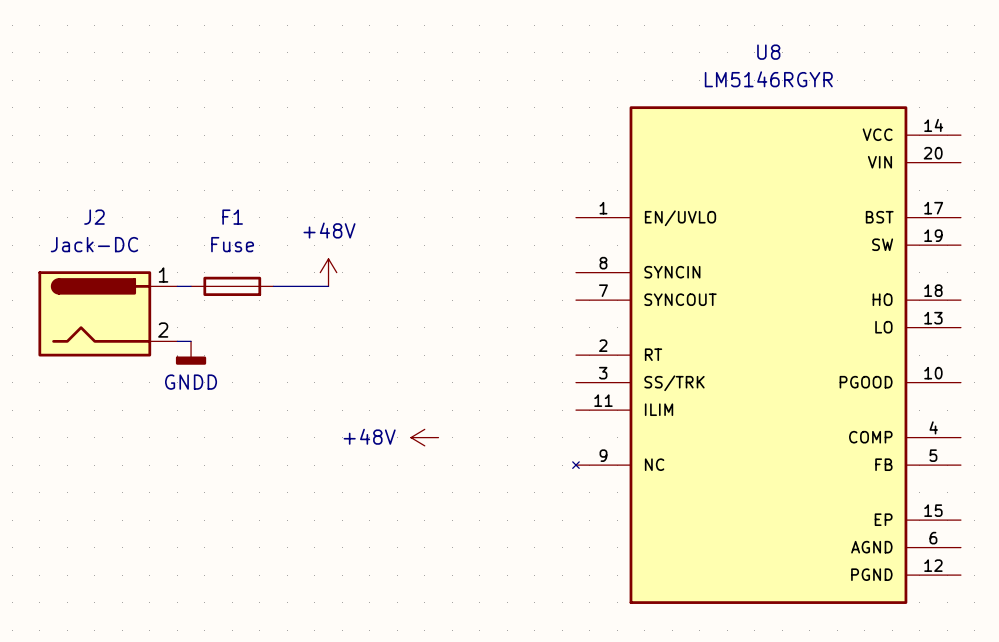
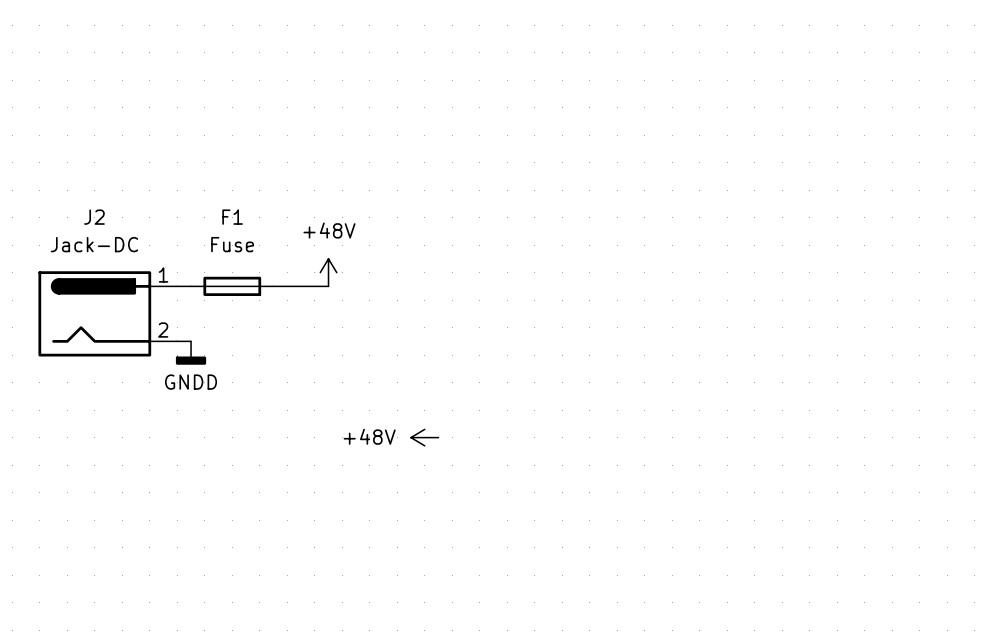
U8: LM5146RGYR (766, 355) -> none

